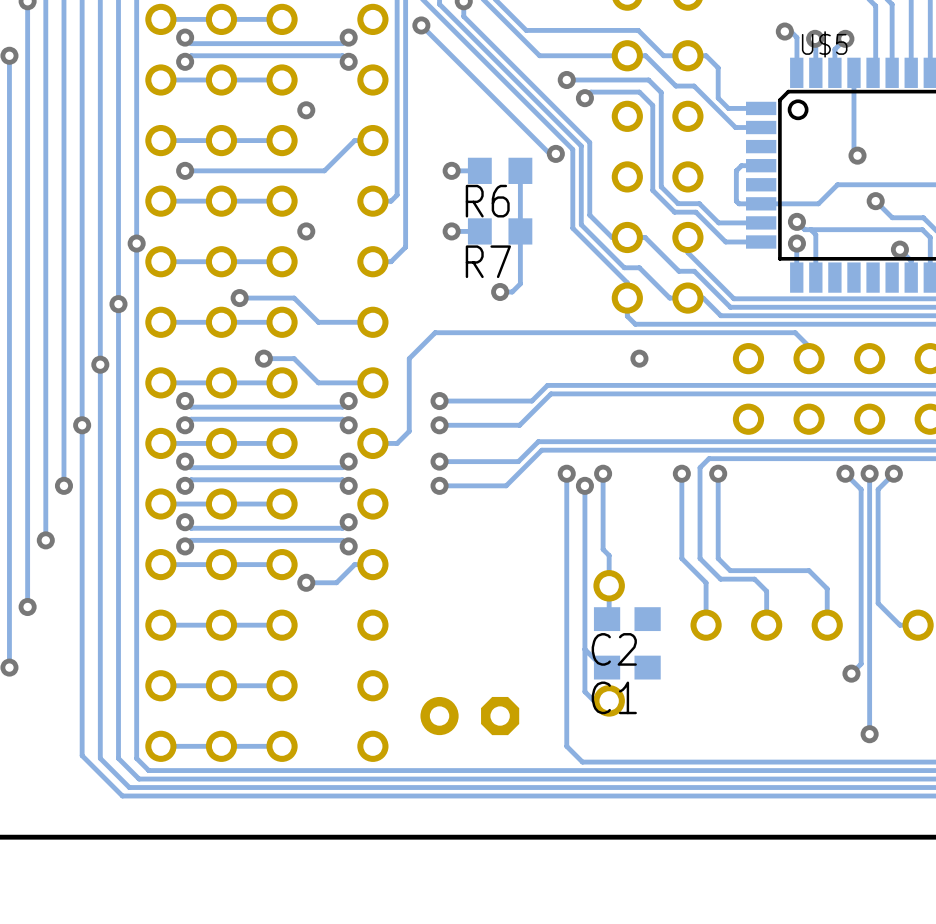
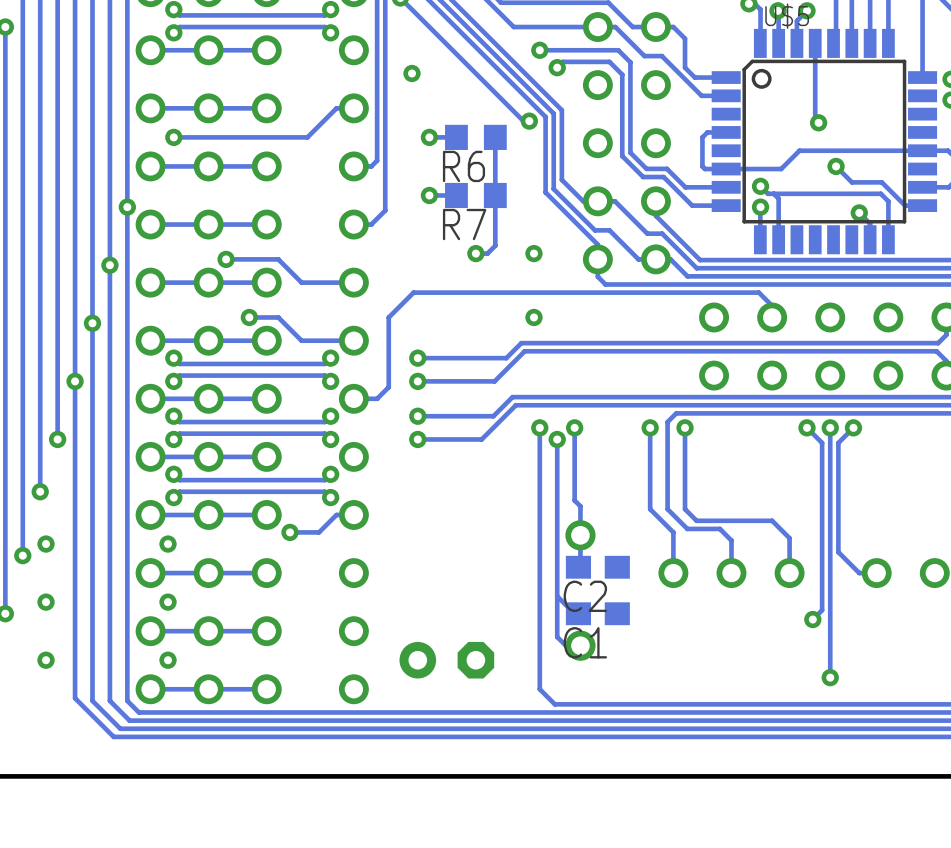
via: none -> (411, 73)
via: (306, 110) -> none
via: (306, 231) -> none
via: none -> (533, 253)
via: none -> (533, 317)
via: (639, 358) -> none
via: none -> (46, 544)
via: none -> (168, 544)
via: none -> (46, 602)
via: none -> (168, 602)
via: none -> (46, 660)
via: none -> (168, 660)

